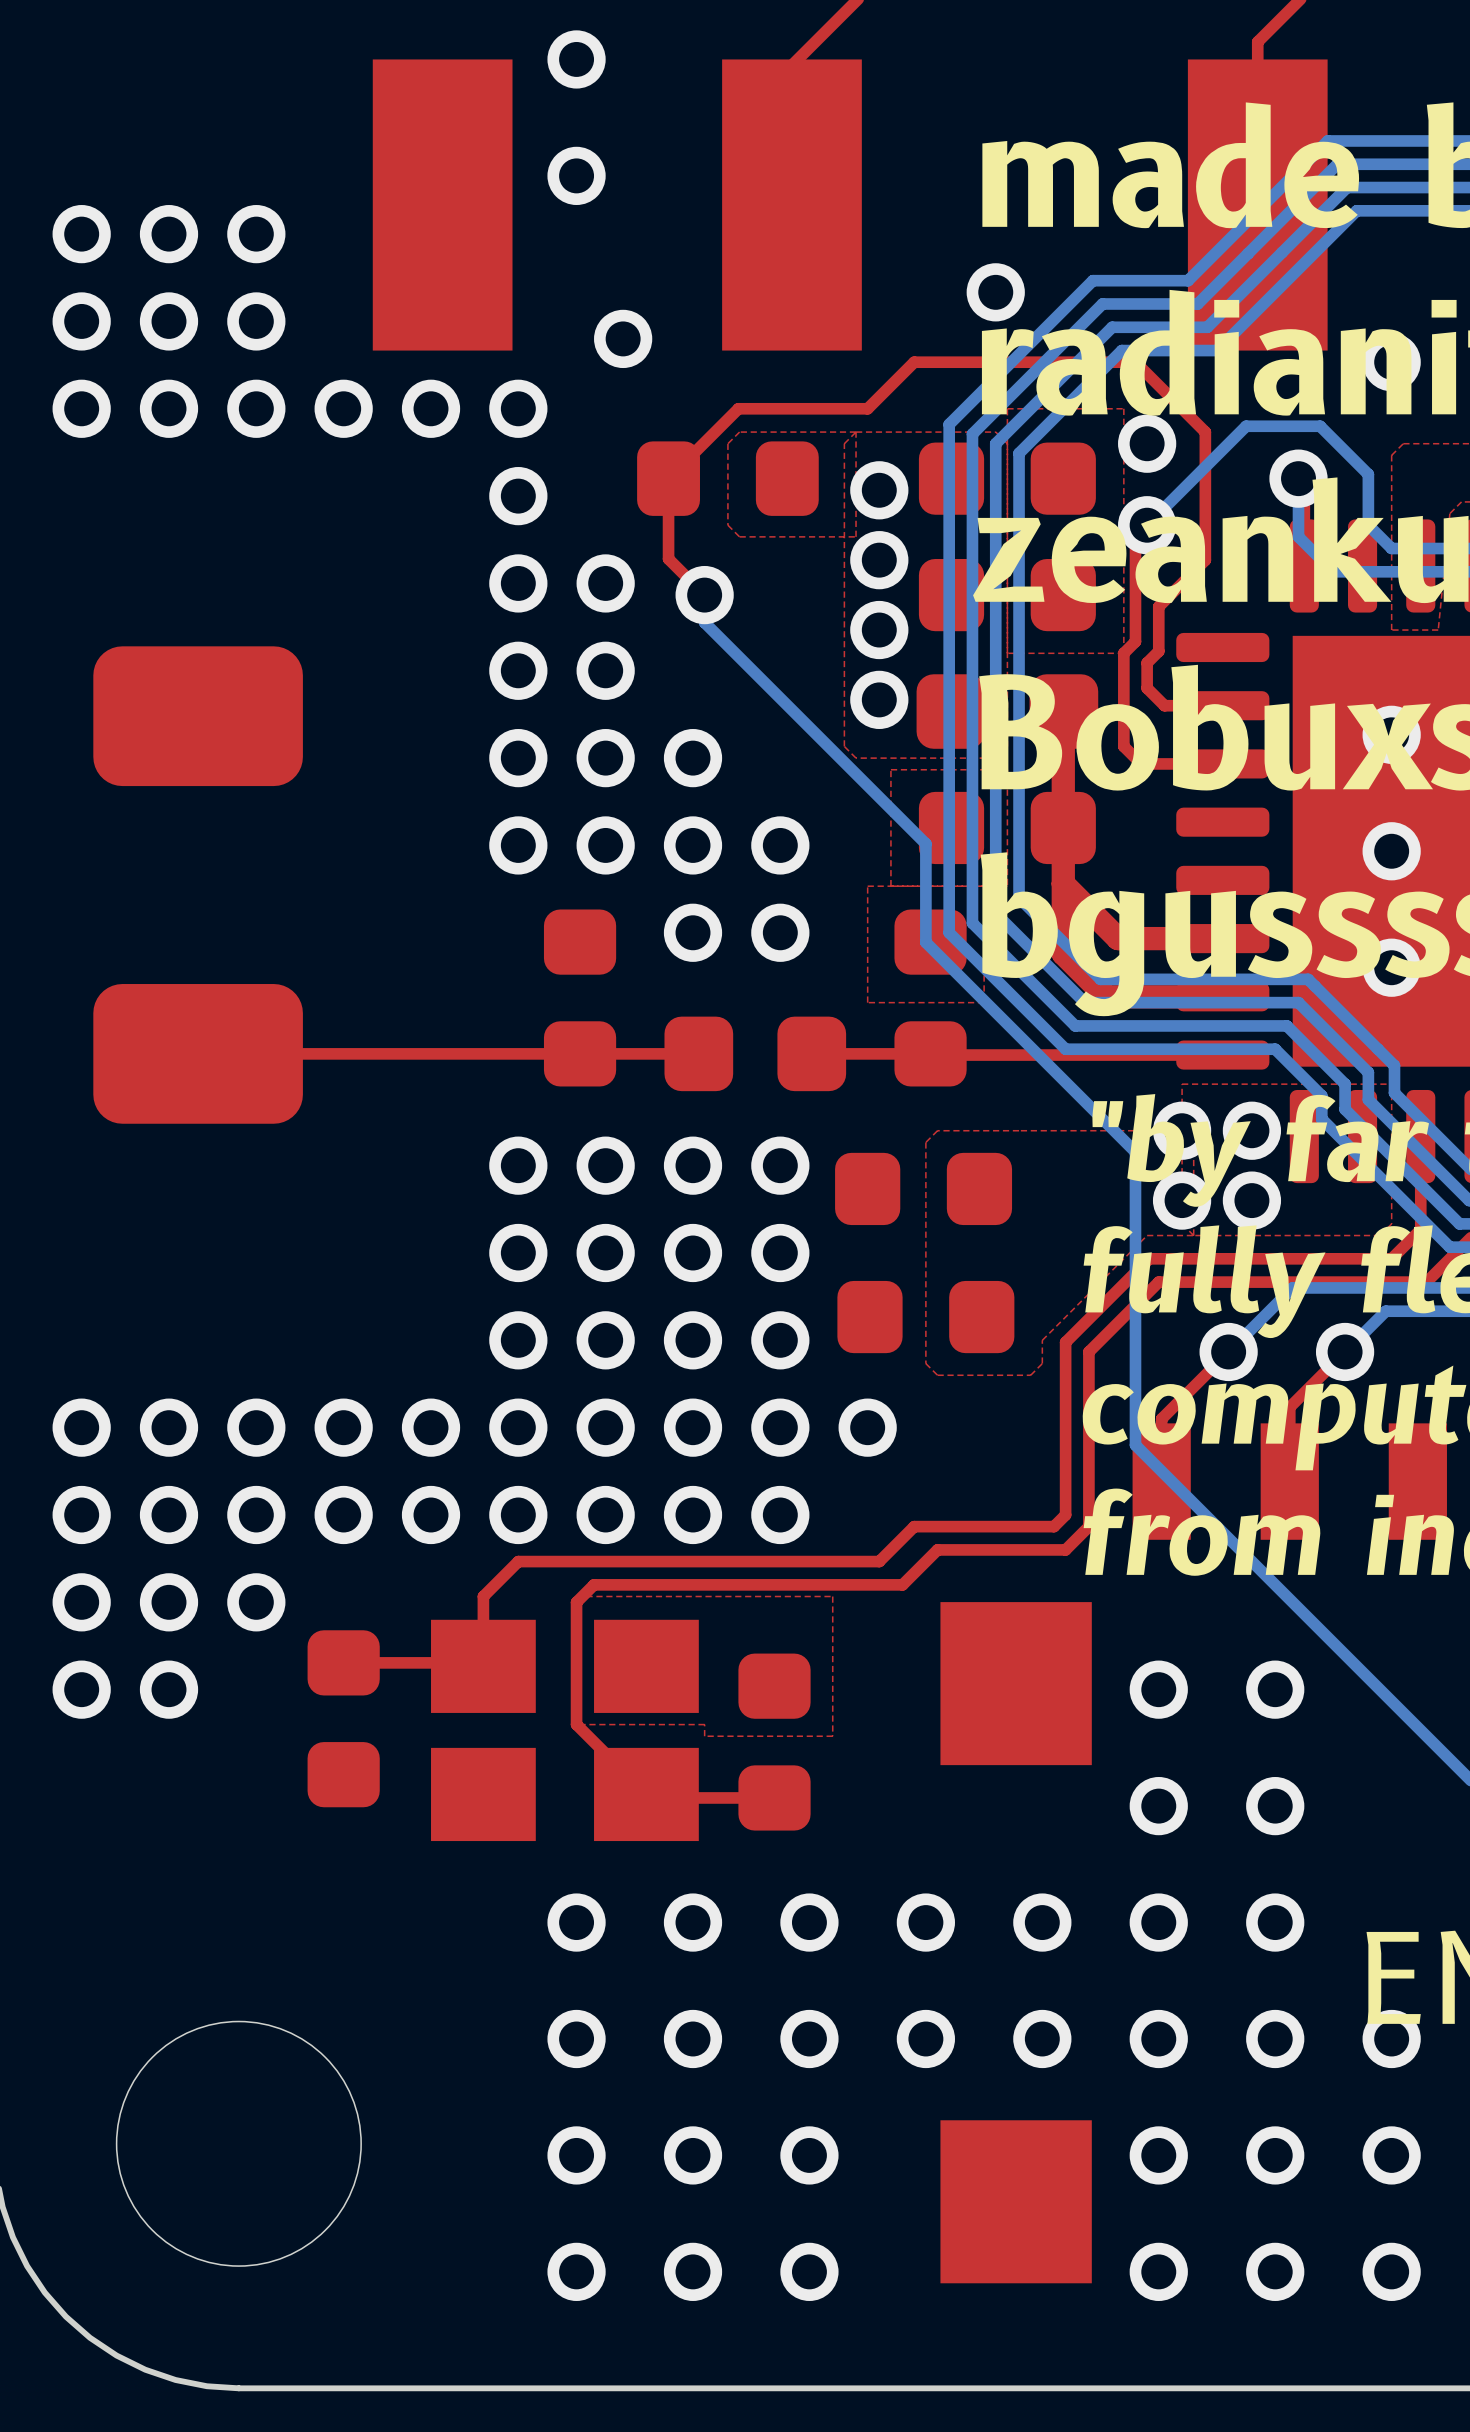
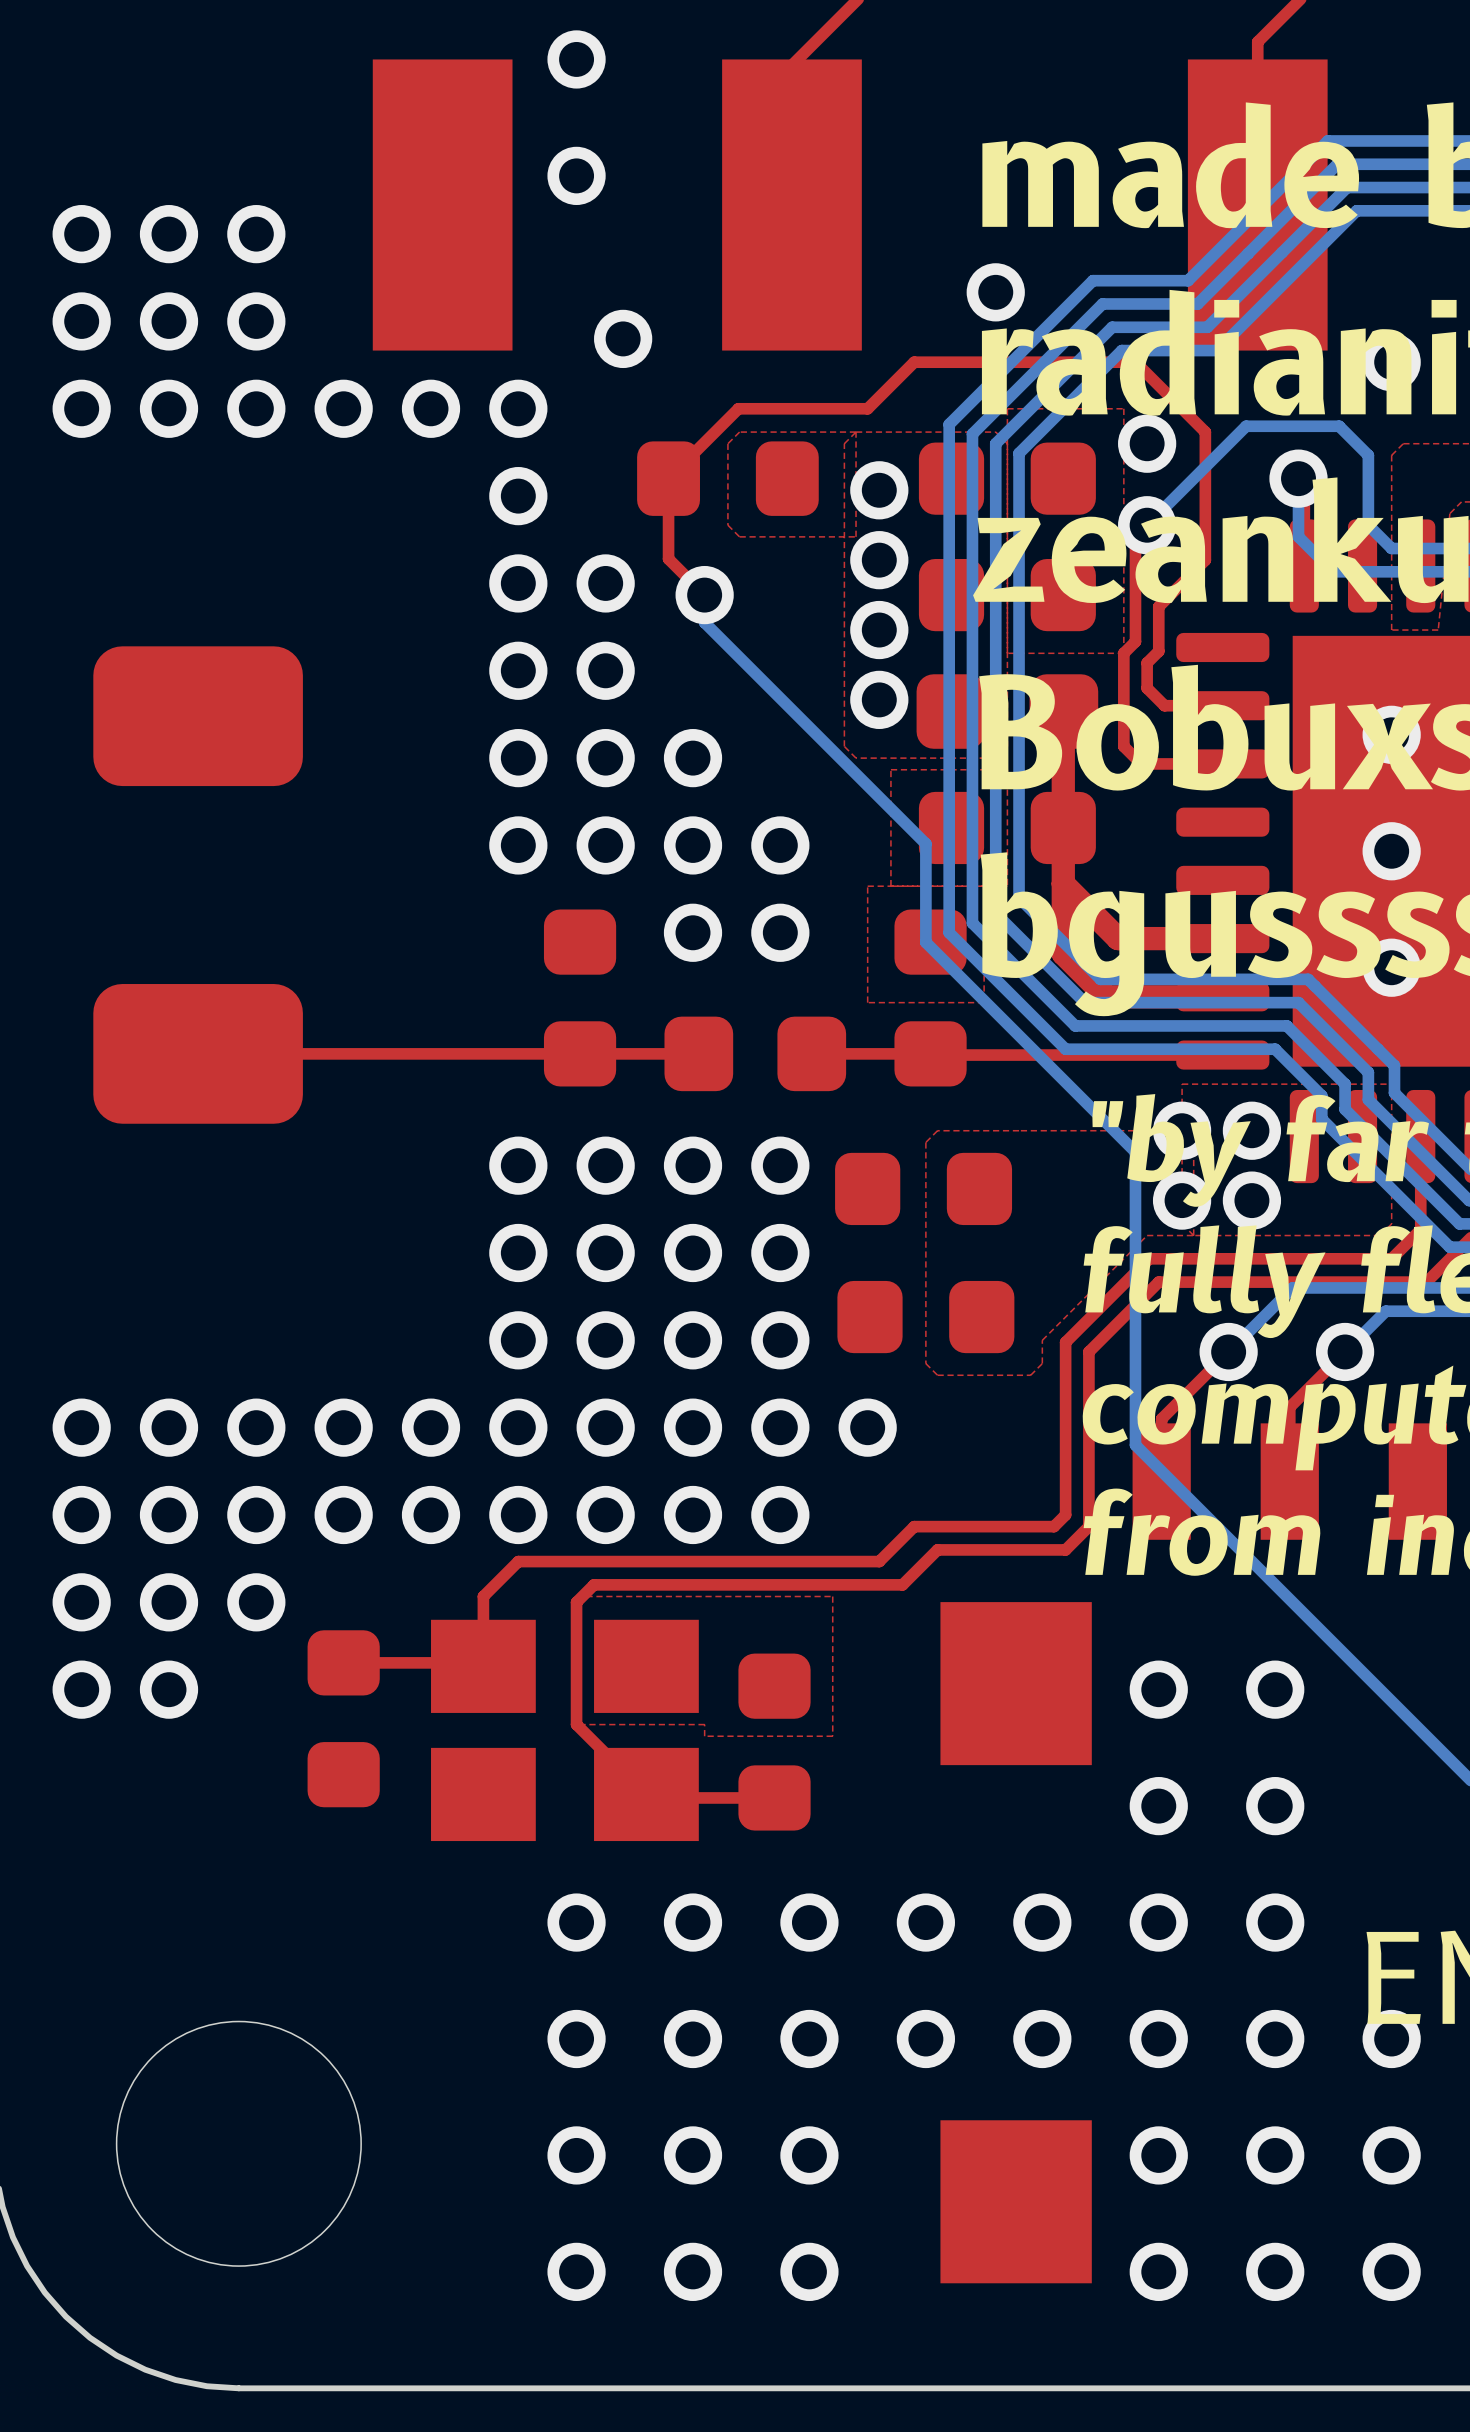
bottom track: (1320, 426) (1368, 474) -> (1320, 426) (1339, 426) (1368, 455) (1368, 474)

